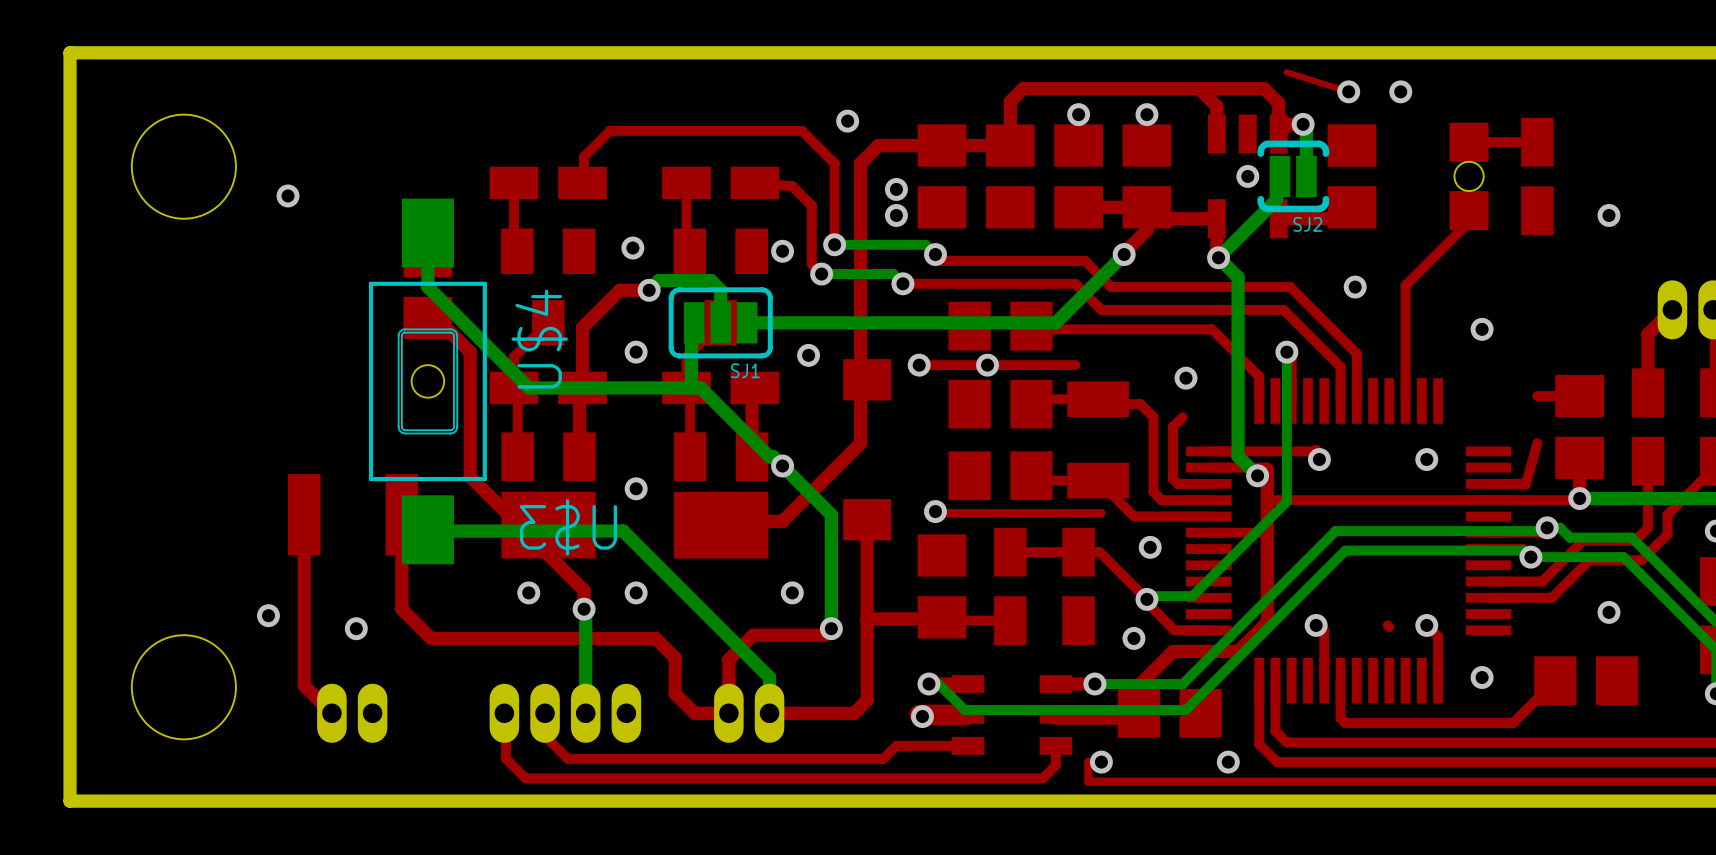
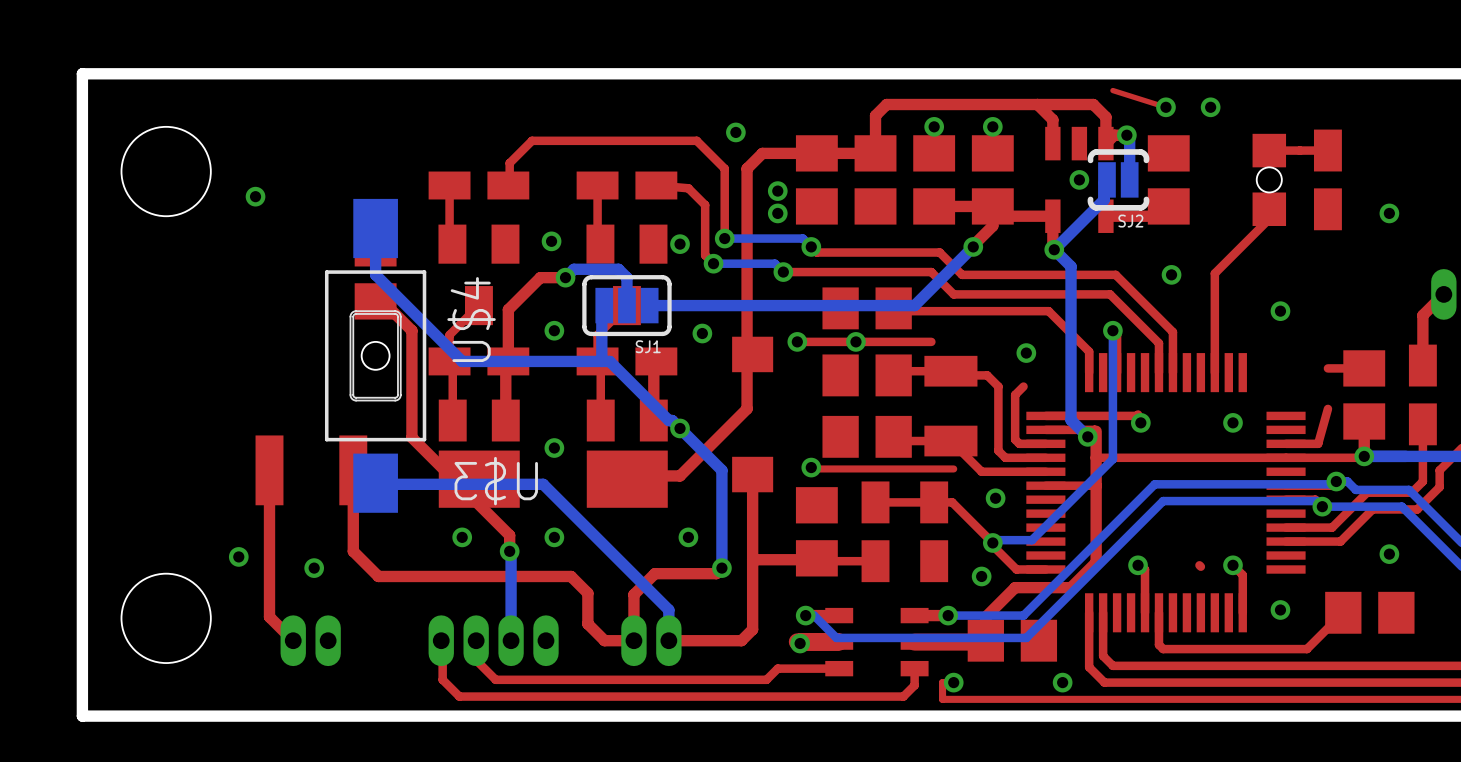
board edge: (86, 52) (70, 52) (70, 801) (86, 801) -> (82, 73) (82, 716)

